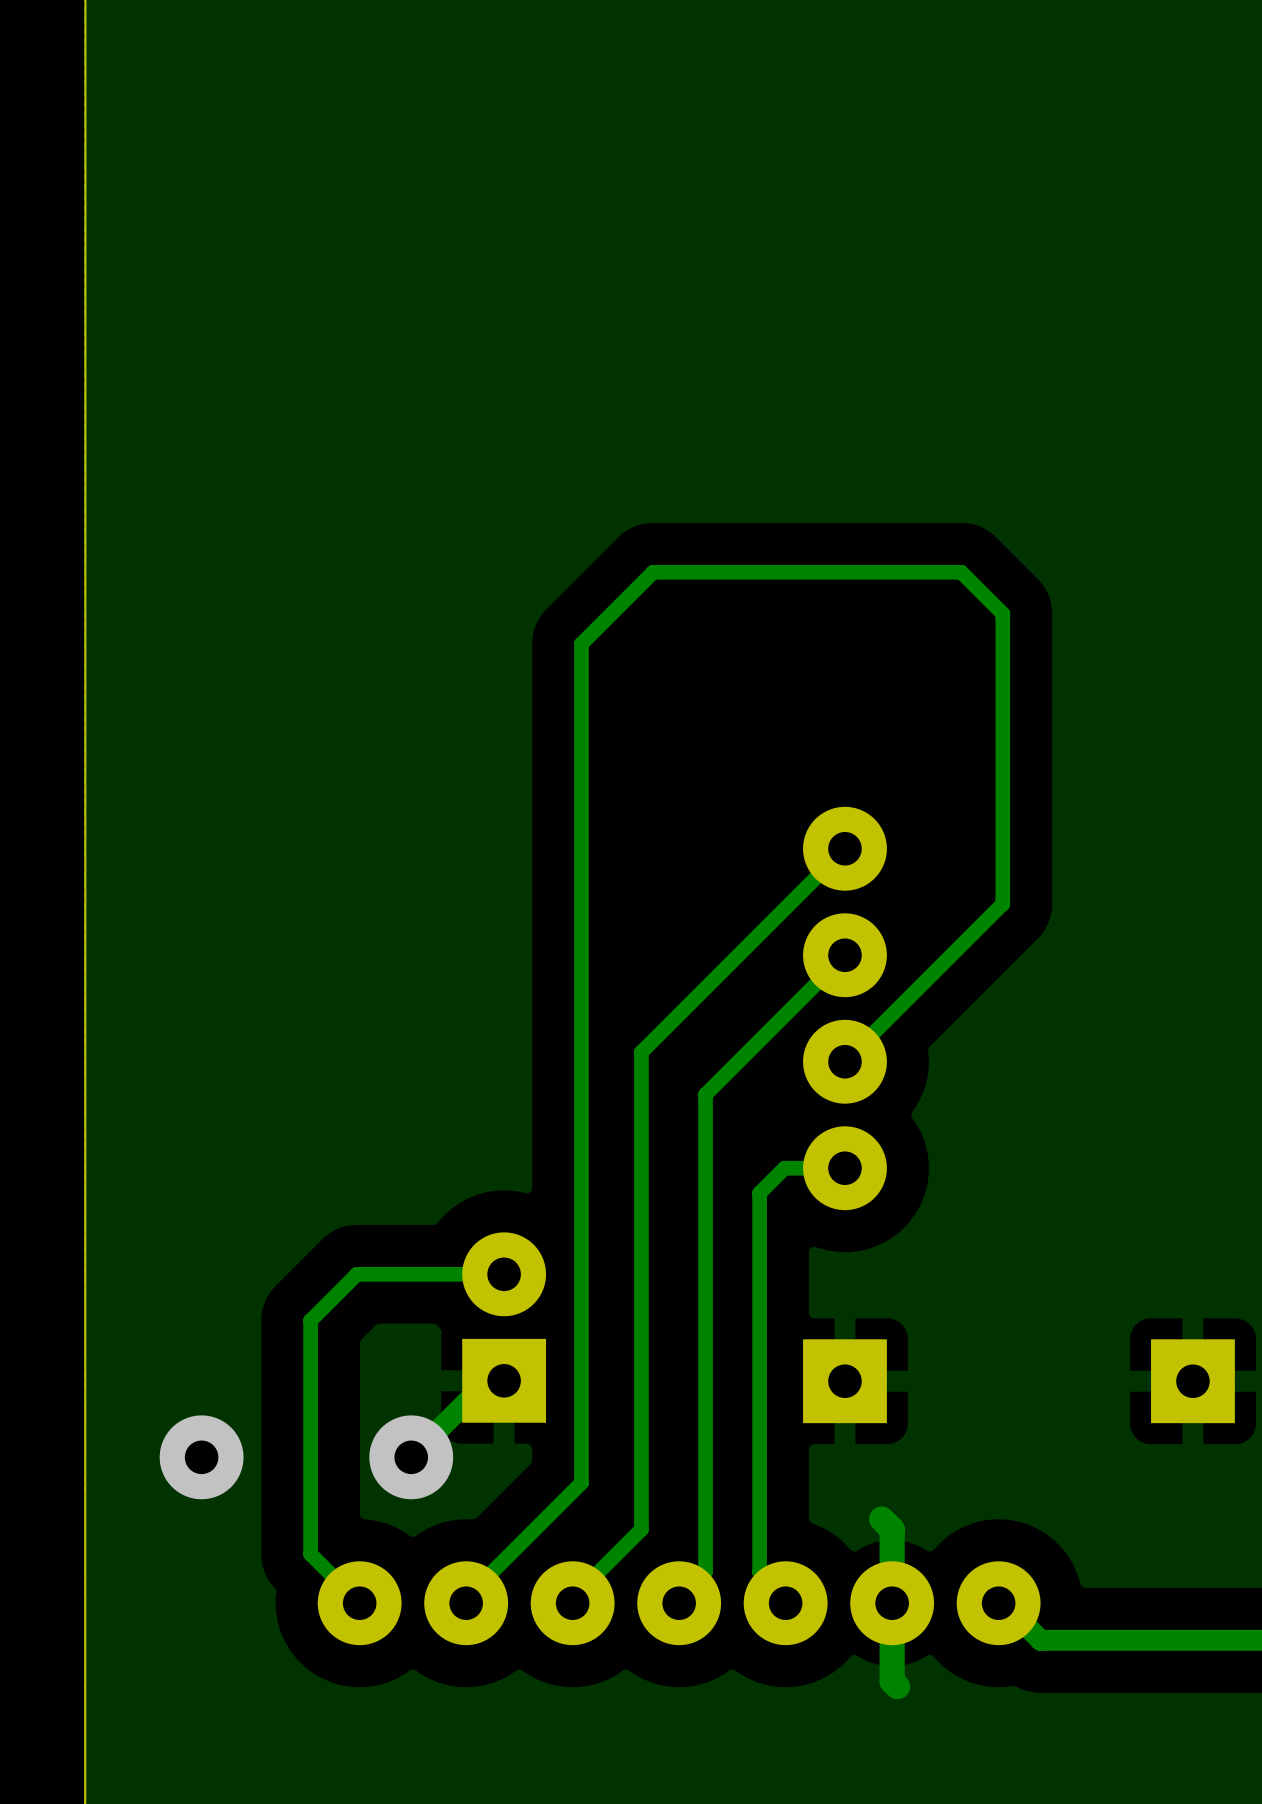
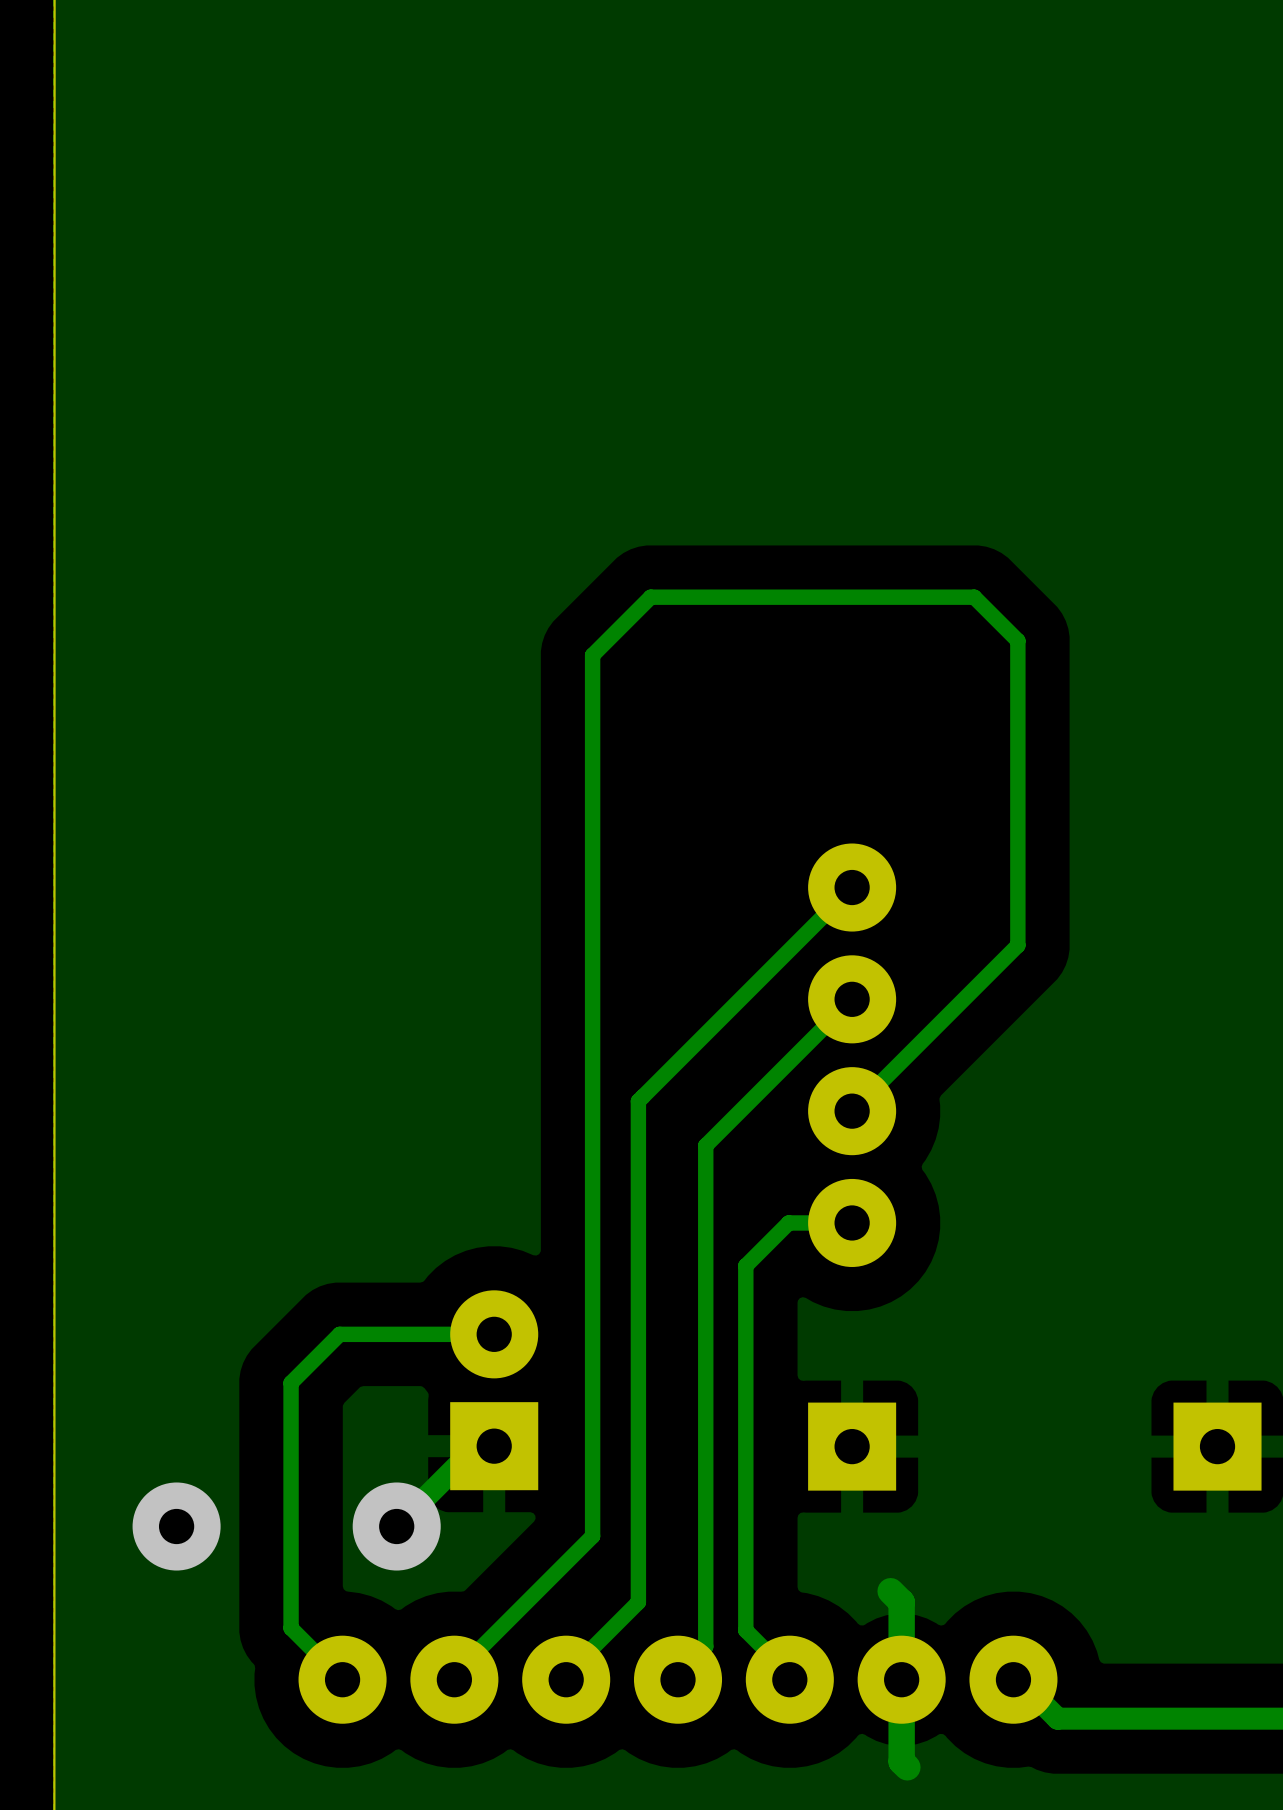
track: (597, 627) (581, 643) (581, 1482) -> (592, 655) (592, 1536) (575, 1553)
track: (759, 1193) (759, 1572) -> (762, 1249) (745, 1265) (745, 1630) (762, 1647)

